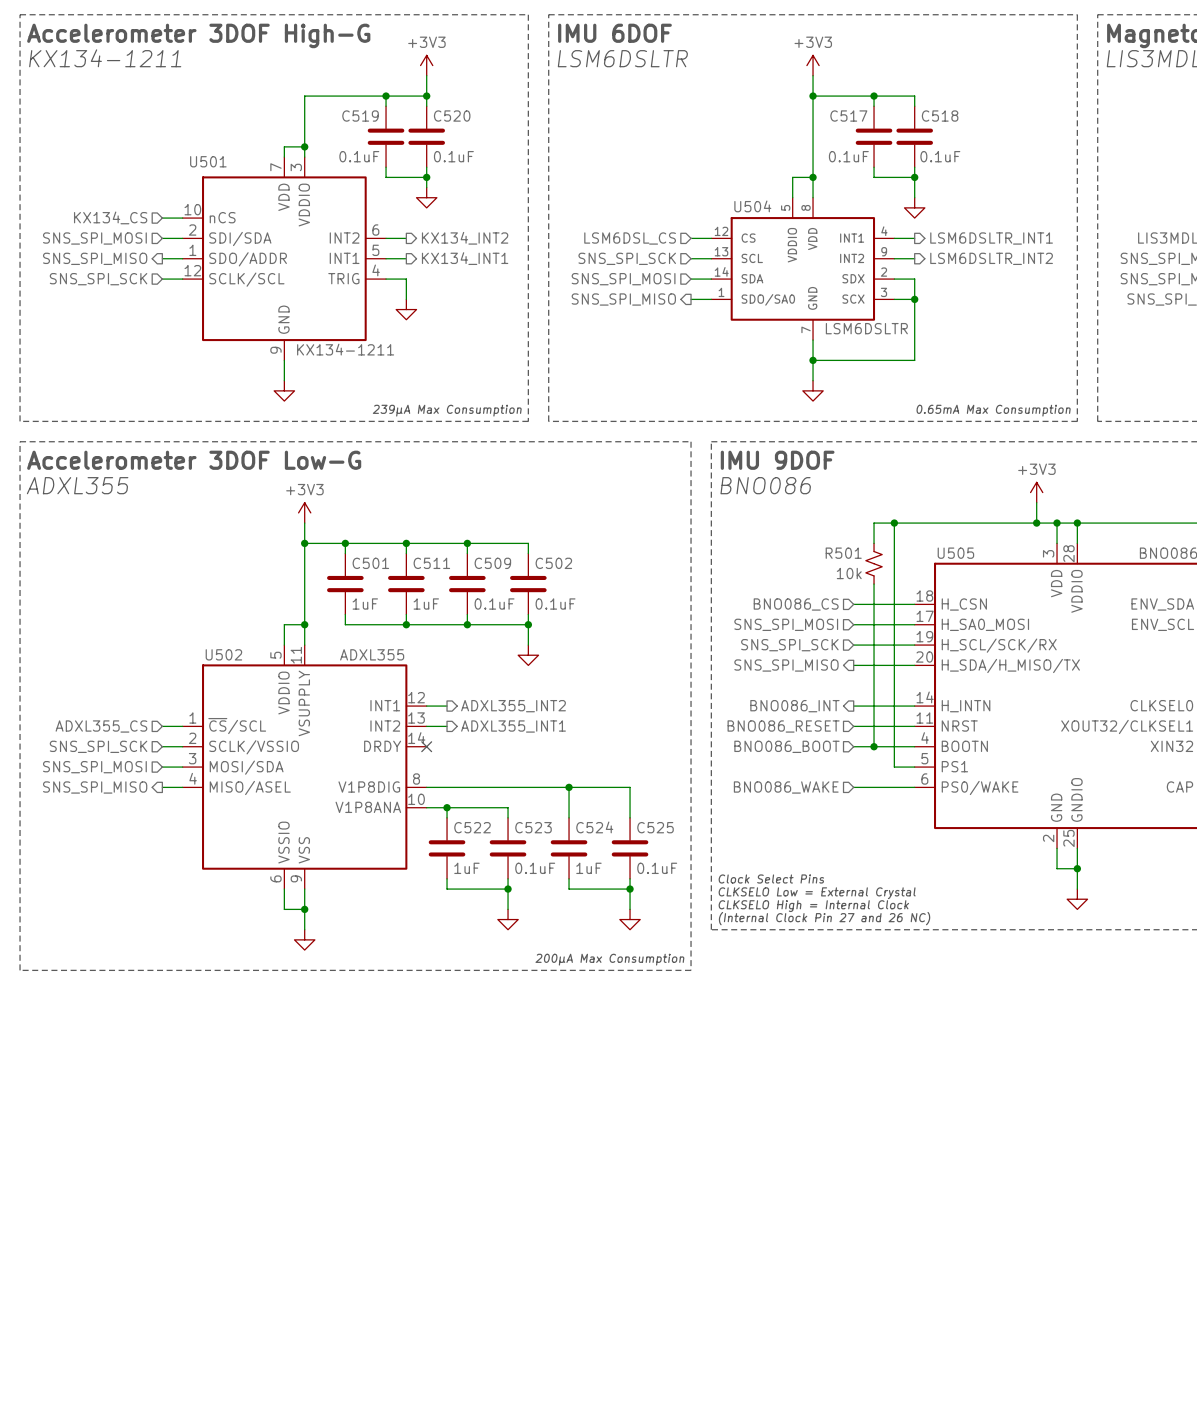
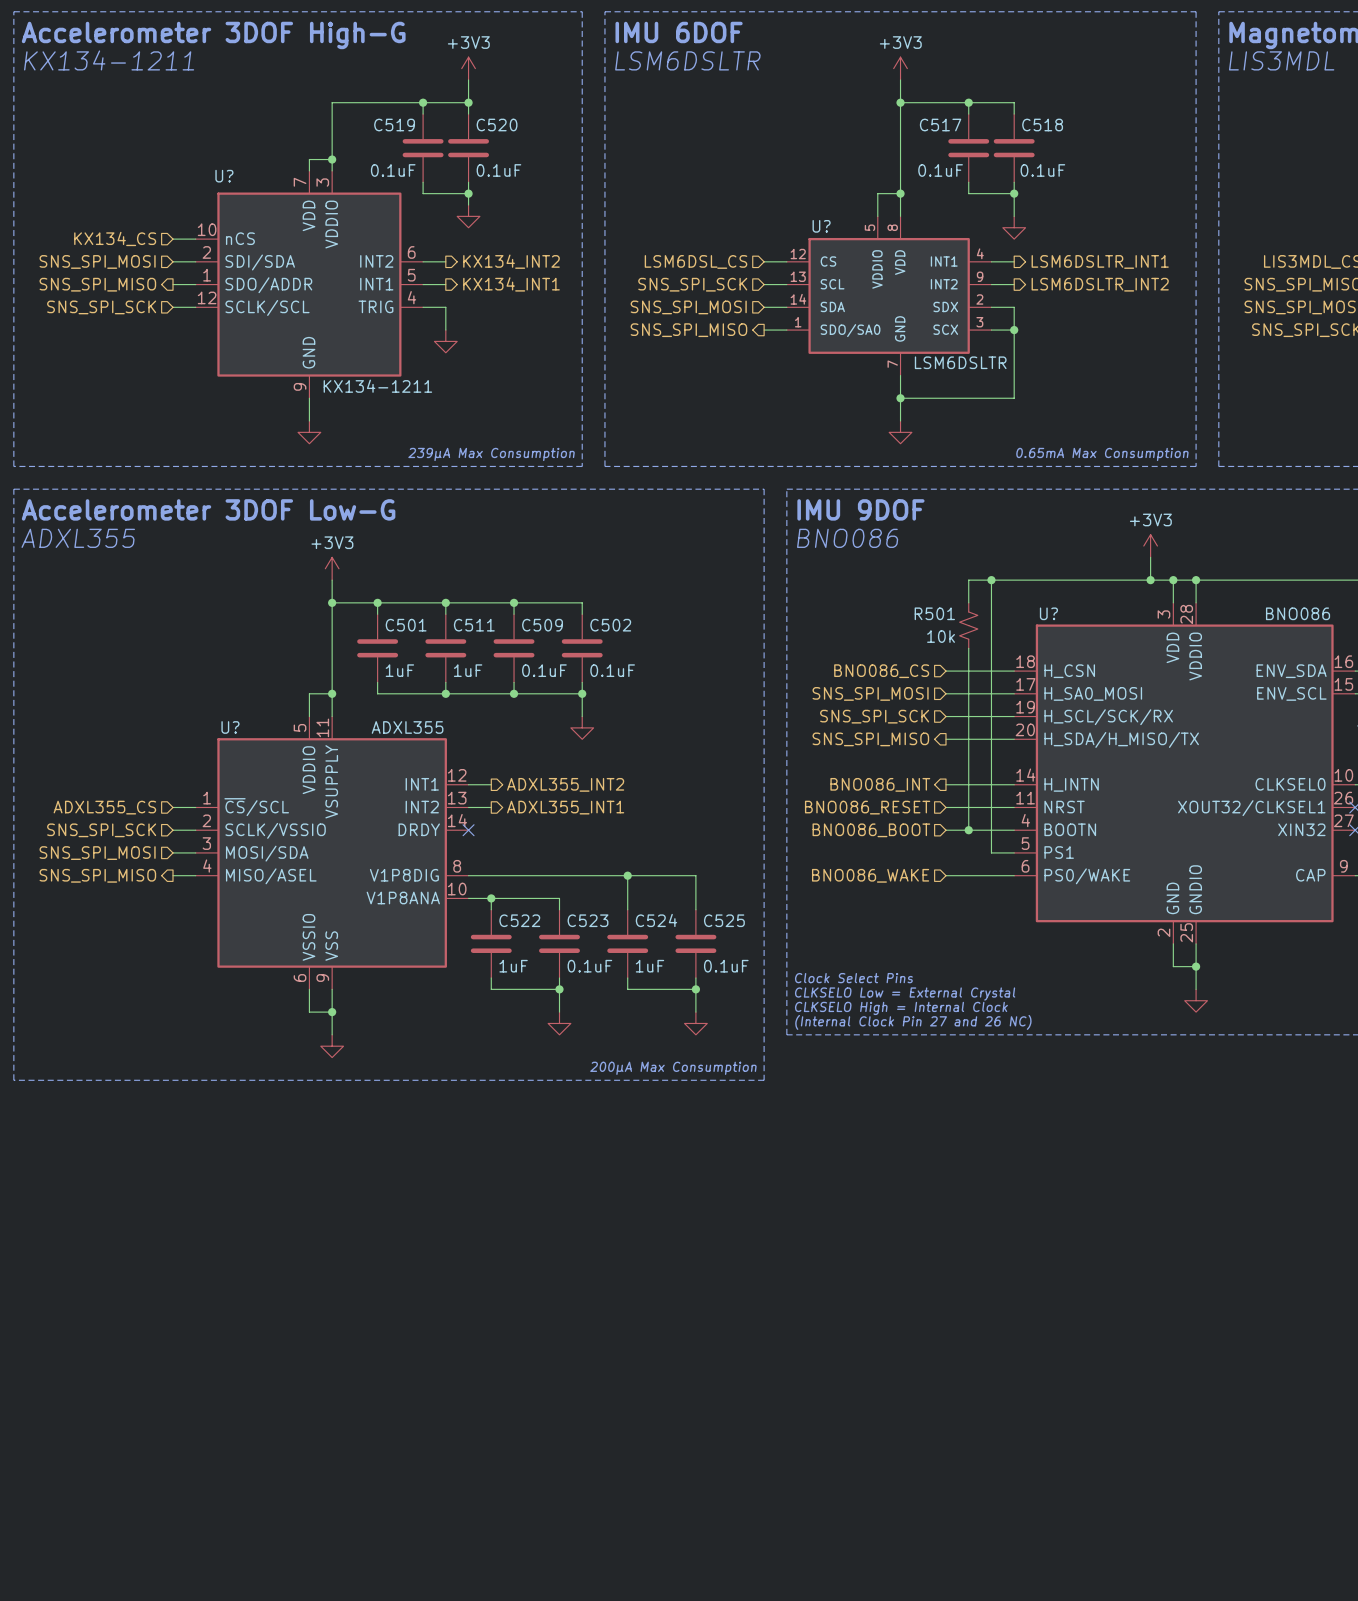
U501 name: U501 (208, 161) -> U? (224, 176)
U504 name: U504 (752, 206) -> U? (821, 226)
U505 name: U505 (955, 553) -> U? (1048, 613)
U502 name: U502 (223, 654) -> U? (230, 727)

